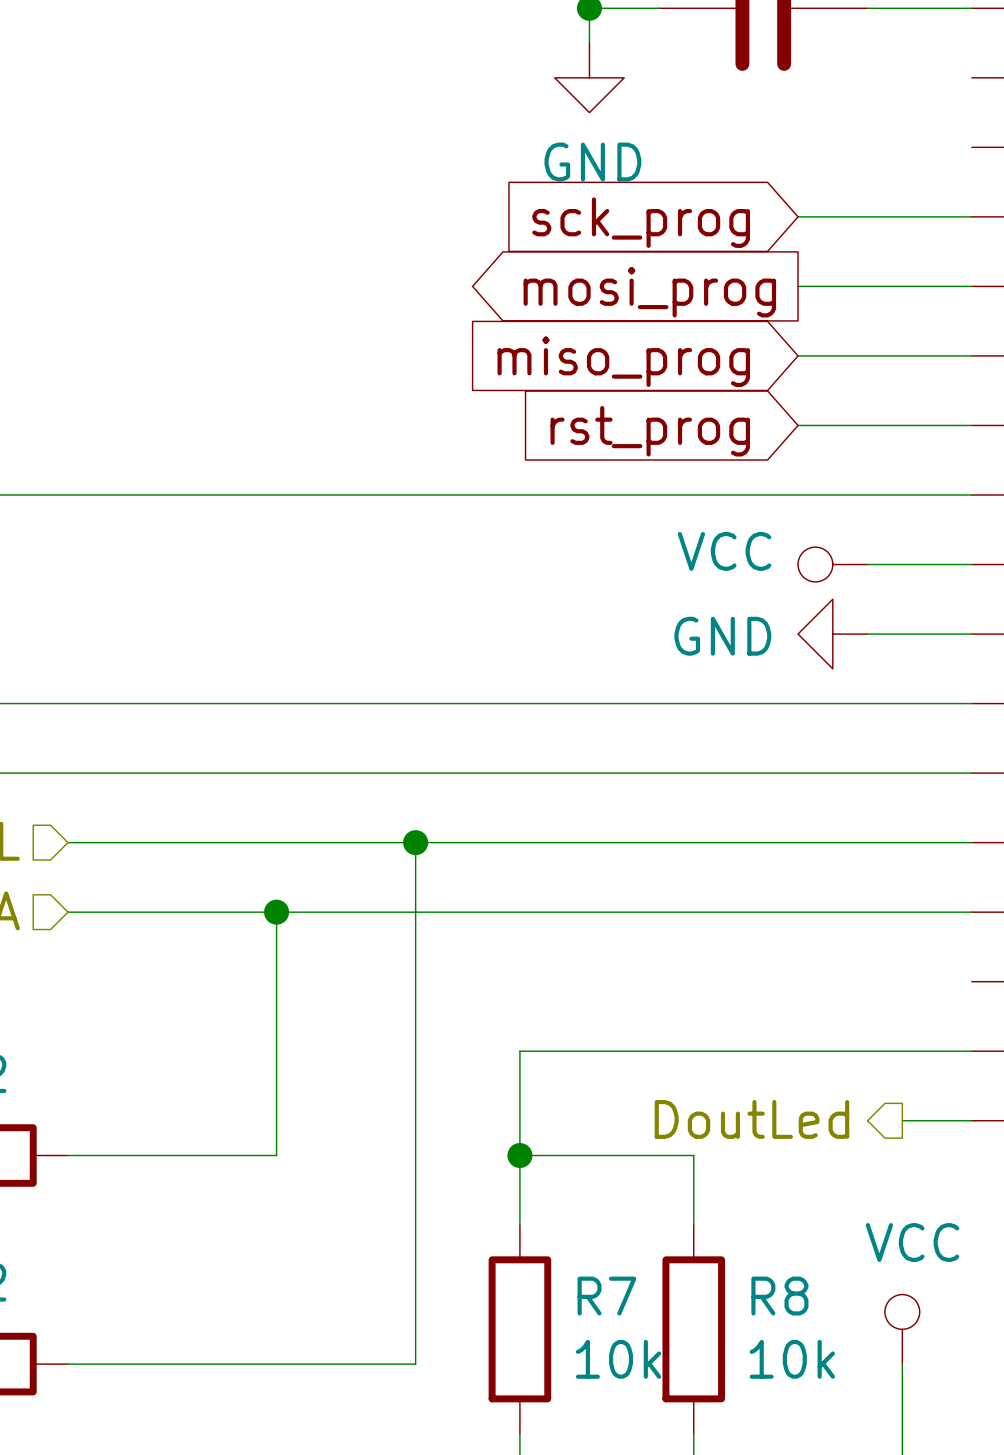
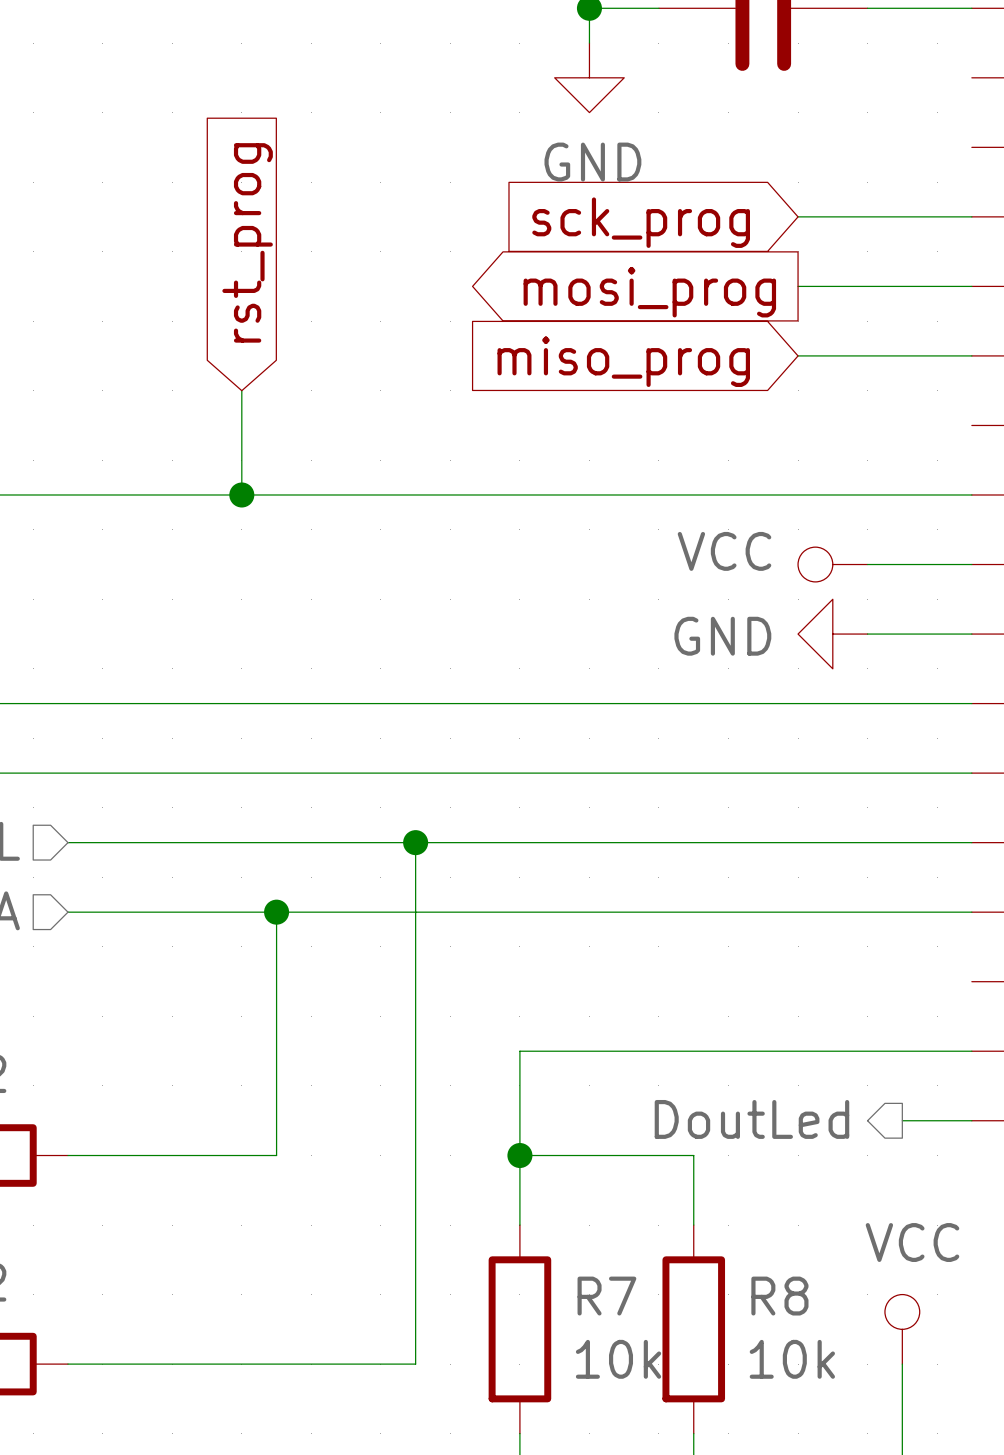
wire: none -> (241, 390) (241, 494)
wire: (798, 425) (971, 425) -> none
global label rotation: 0° (650, 431) -> 90° clockwise (247, 242)
global label position: rst_prog (650, 431) -> rst_prog (247, 242)
junction: none -> (241, 494)

